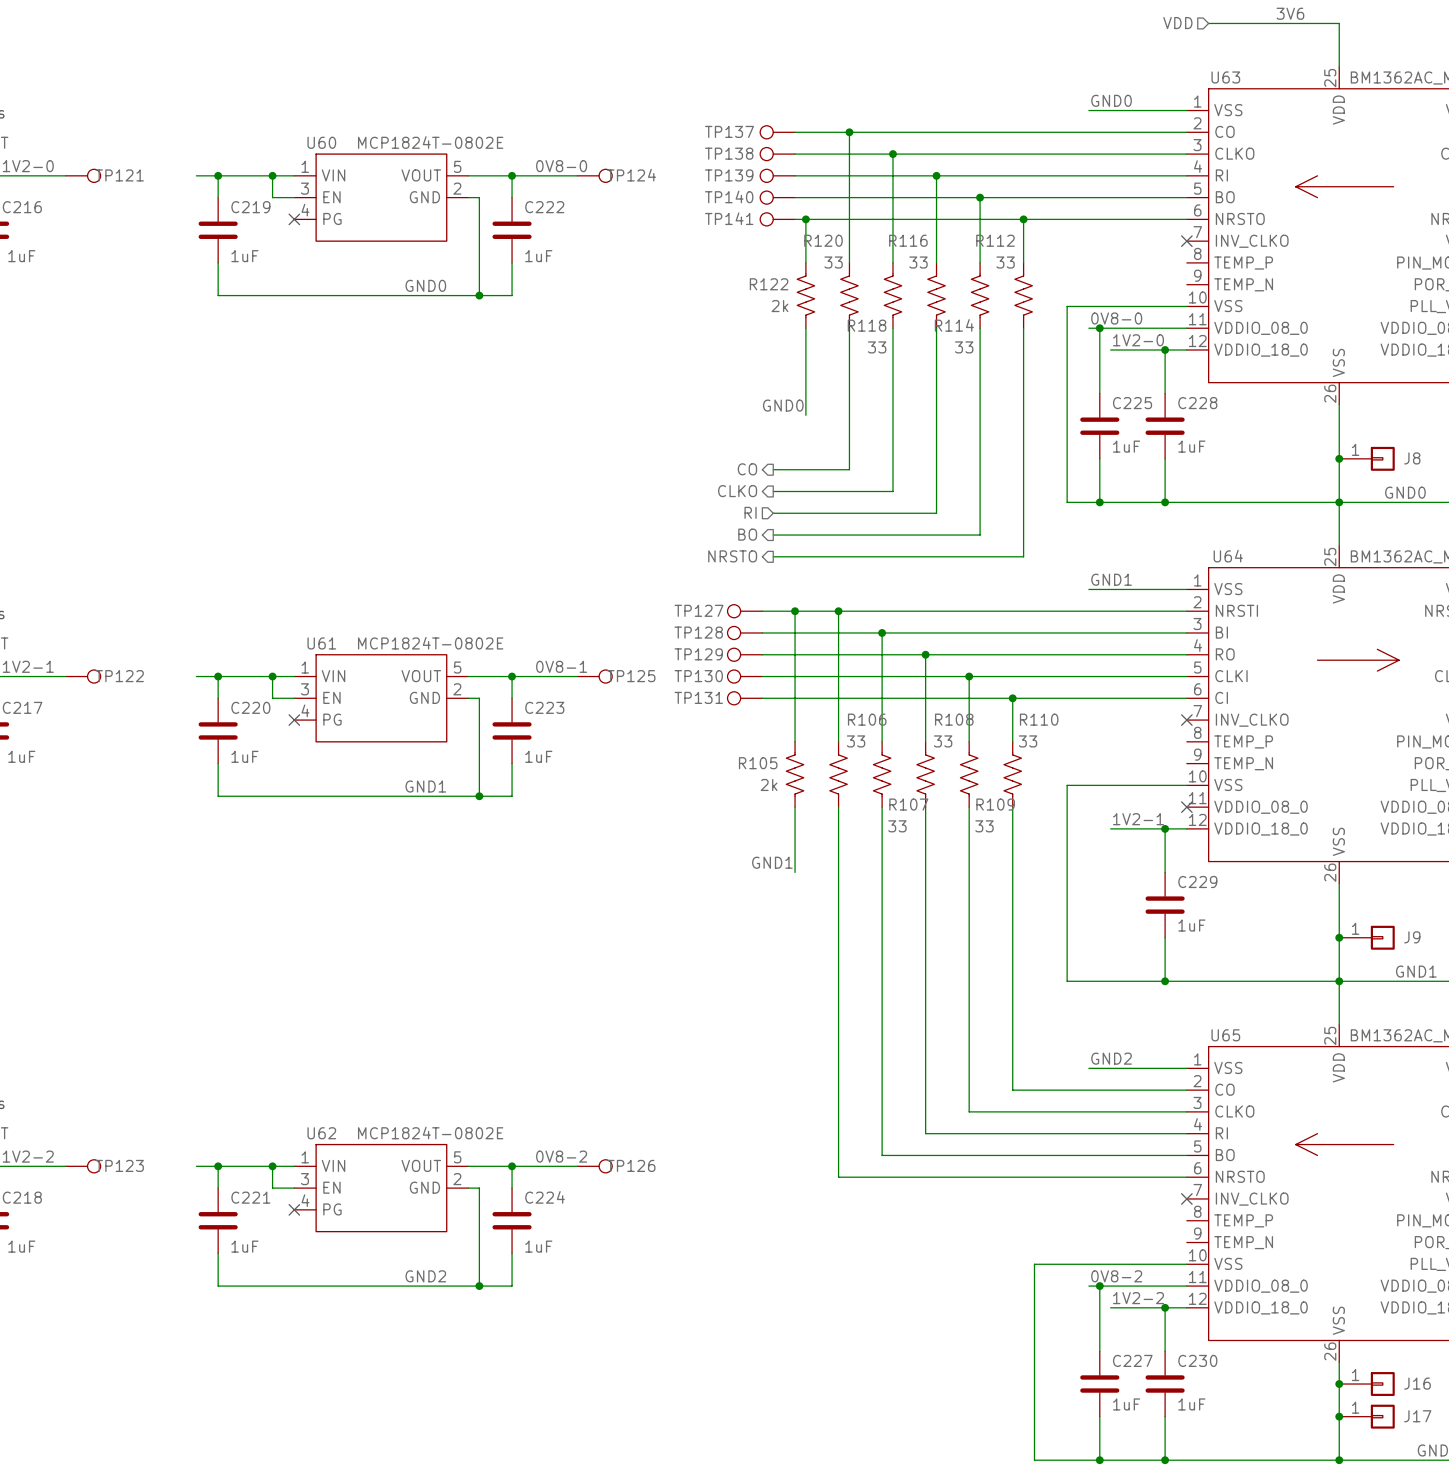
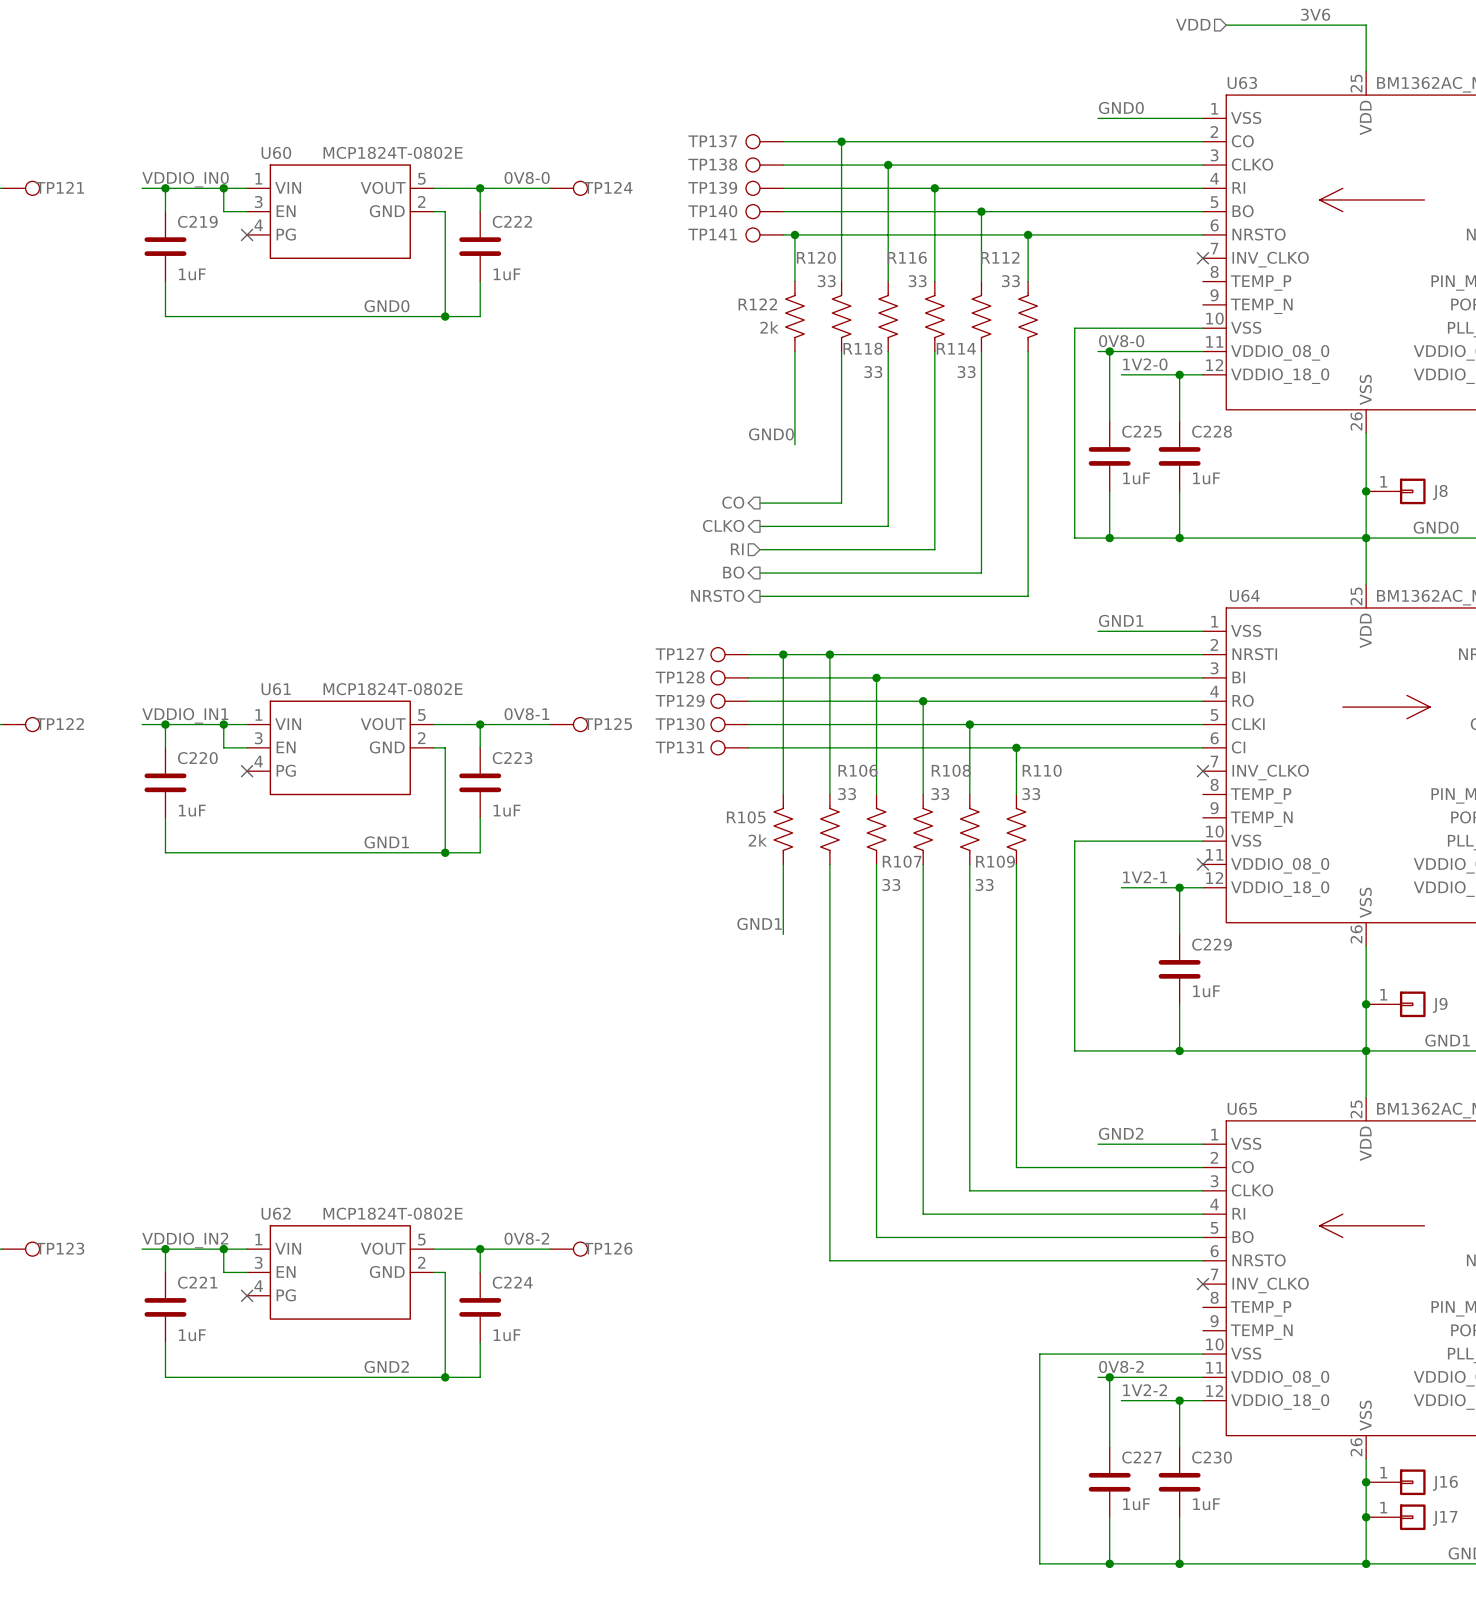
label: none -> VDDIO_IN0 (185, 179)
label: none -> VDDIO_IN1 (185, 715)
label: none -> VDDIO_IN2 (185, 1240)

